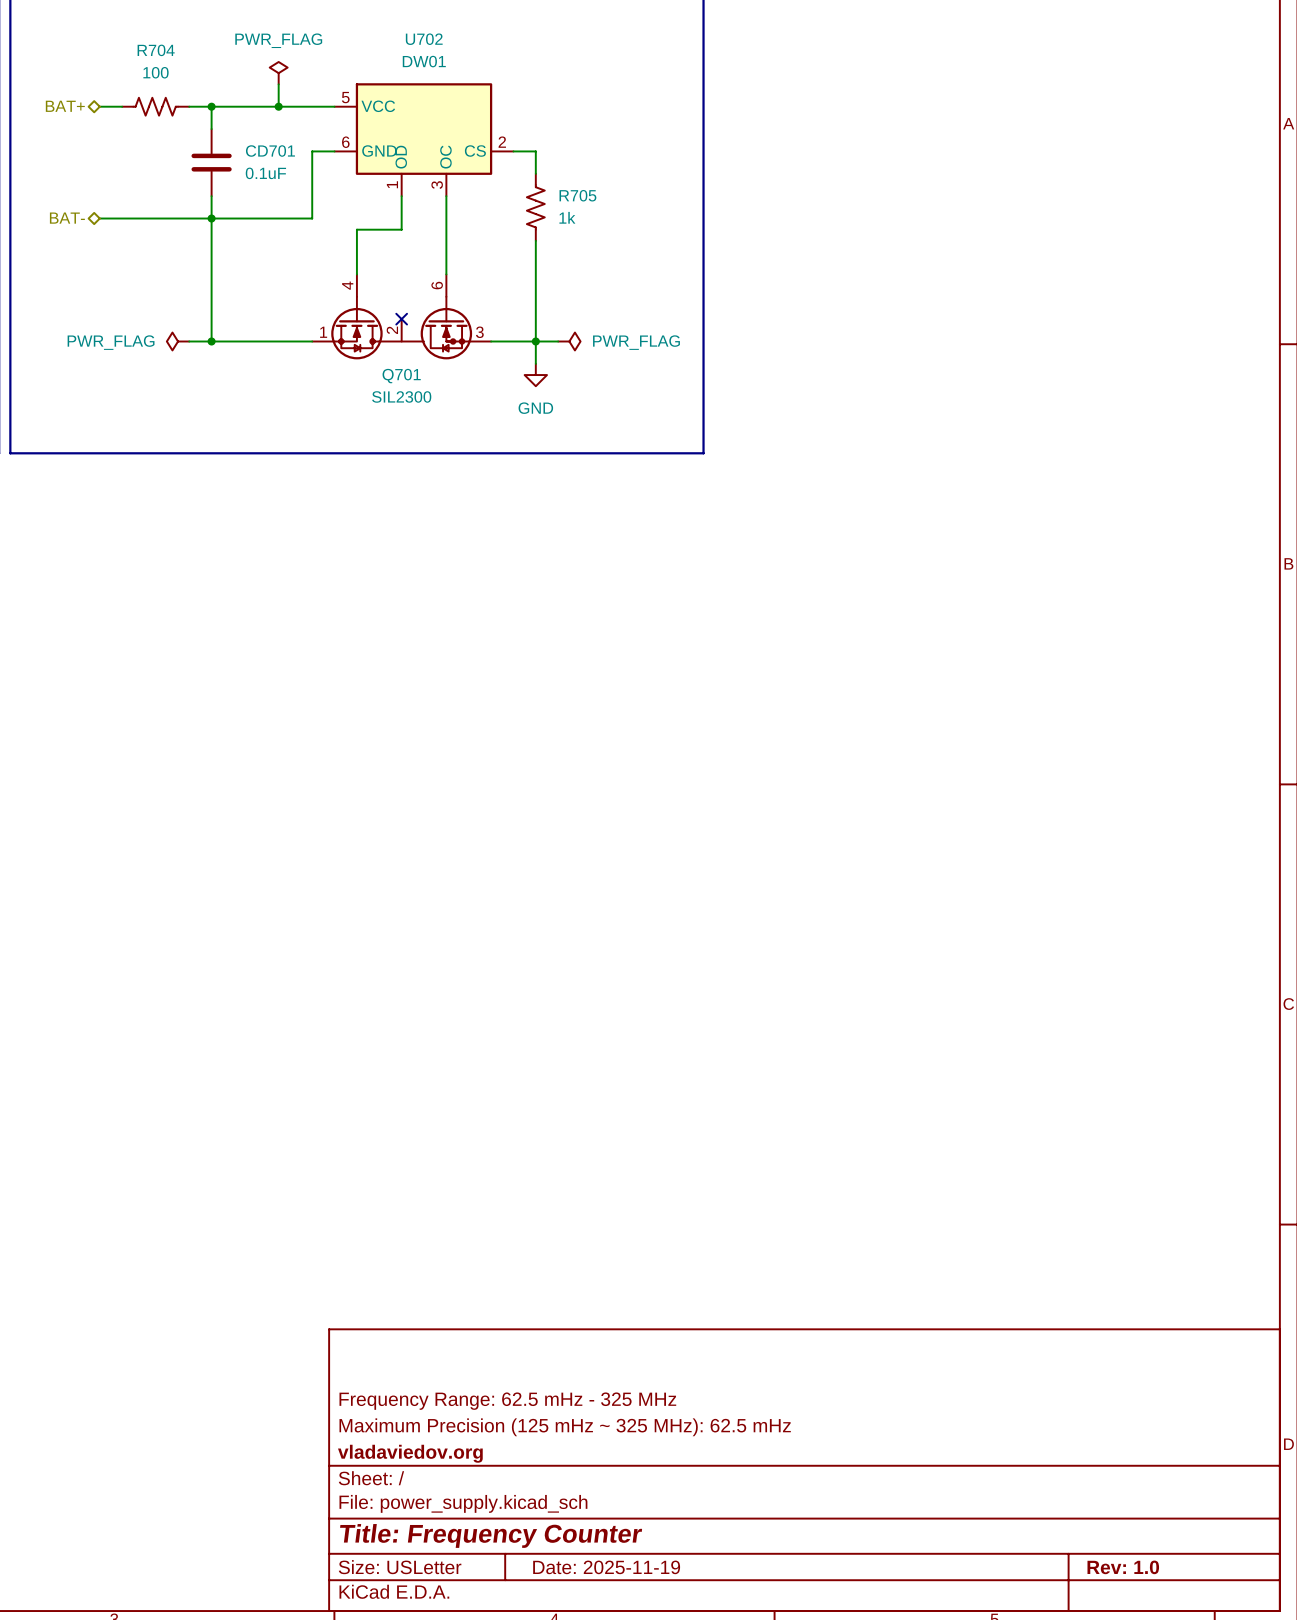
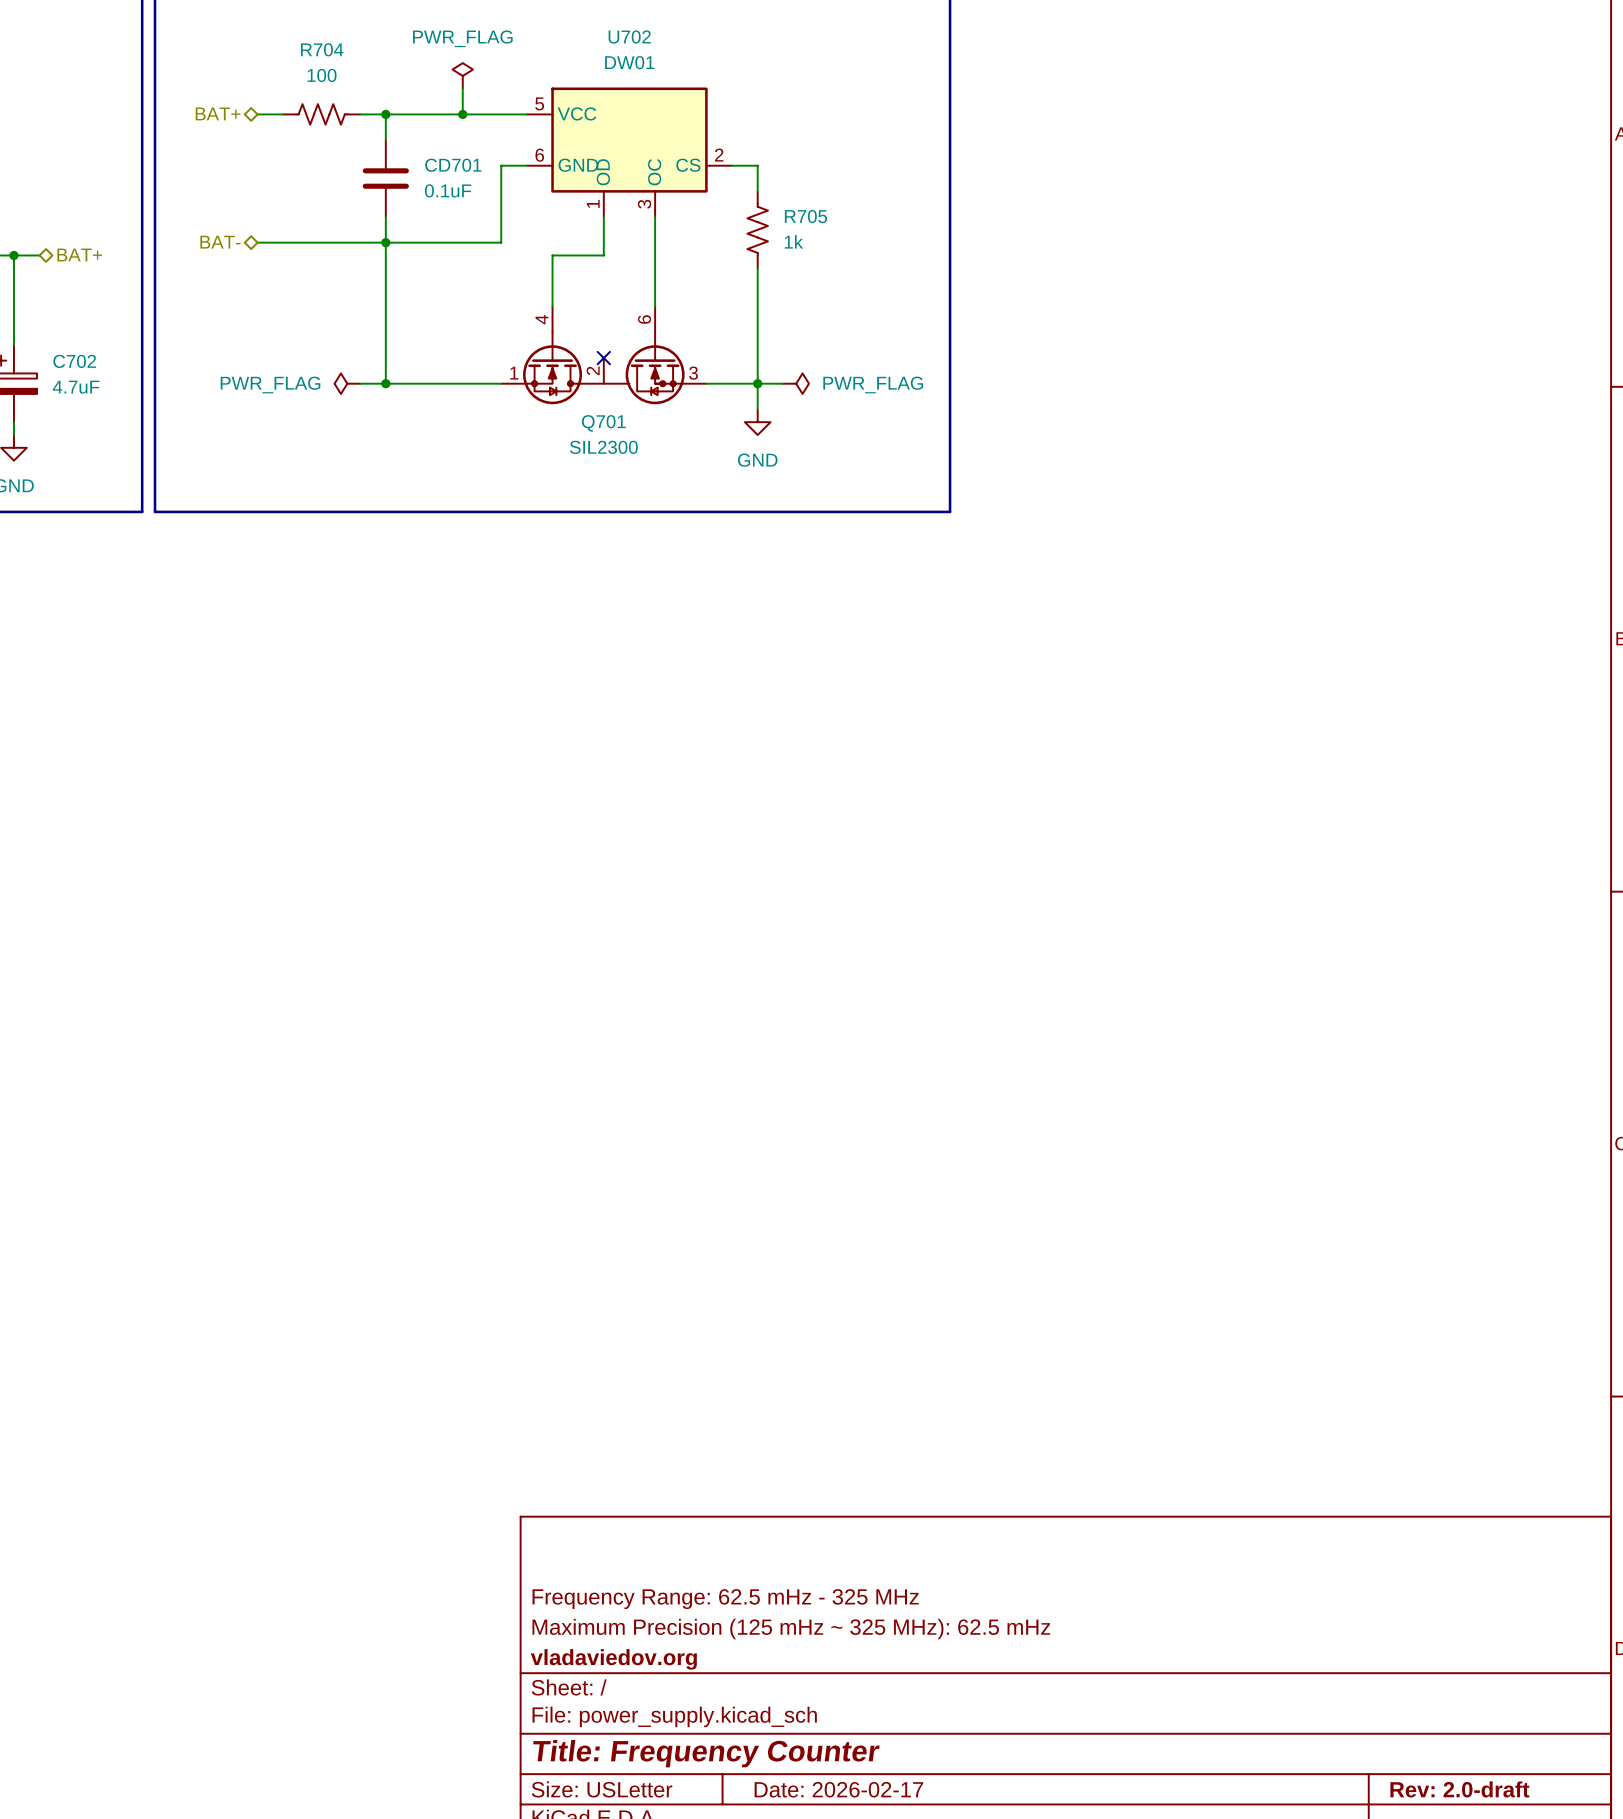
title block: Date: 2025-11-19 (606, 1567) -> Date: 2026-02-17 (838, 1789)
title block: Rev: 1.0 (1123, 1567) -> Rev: 2.0-draft (1459, 1789)

